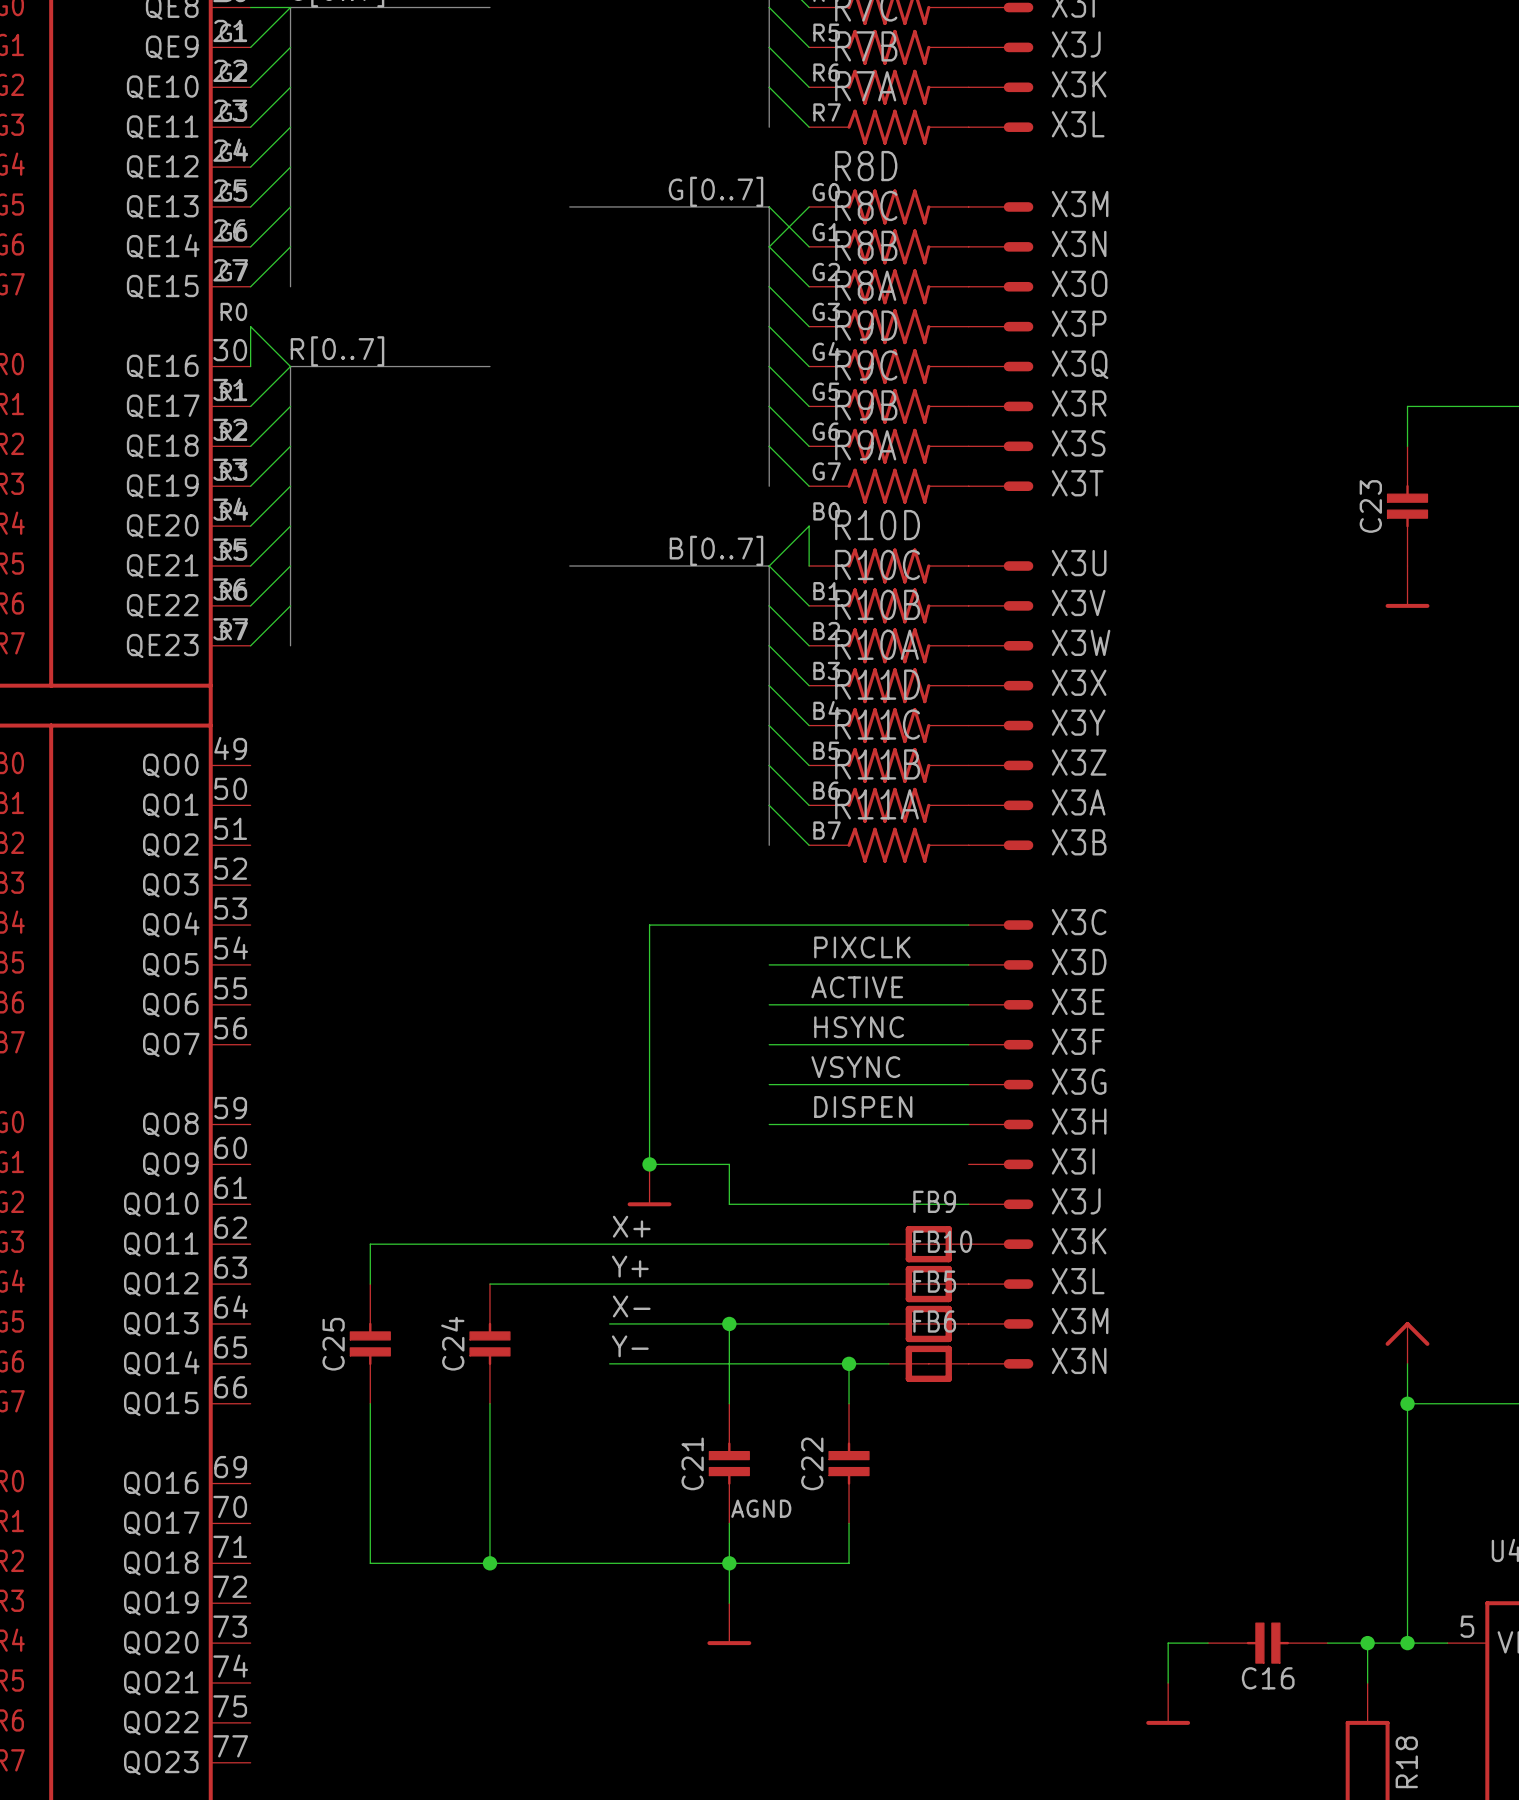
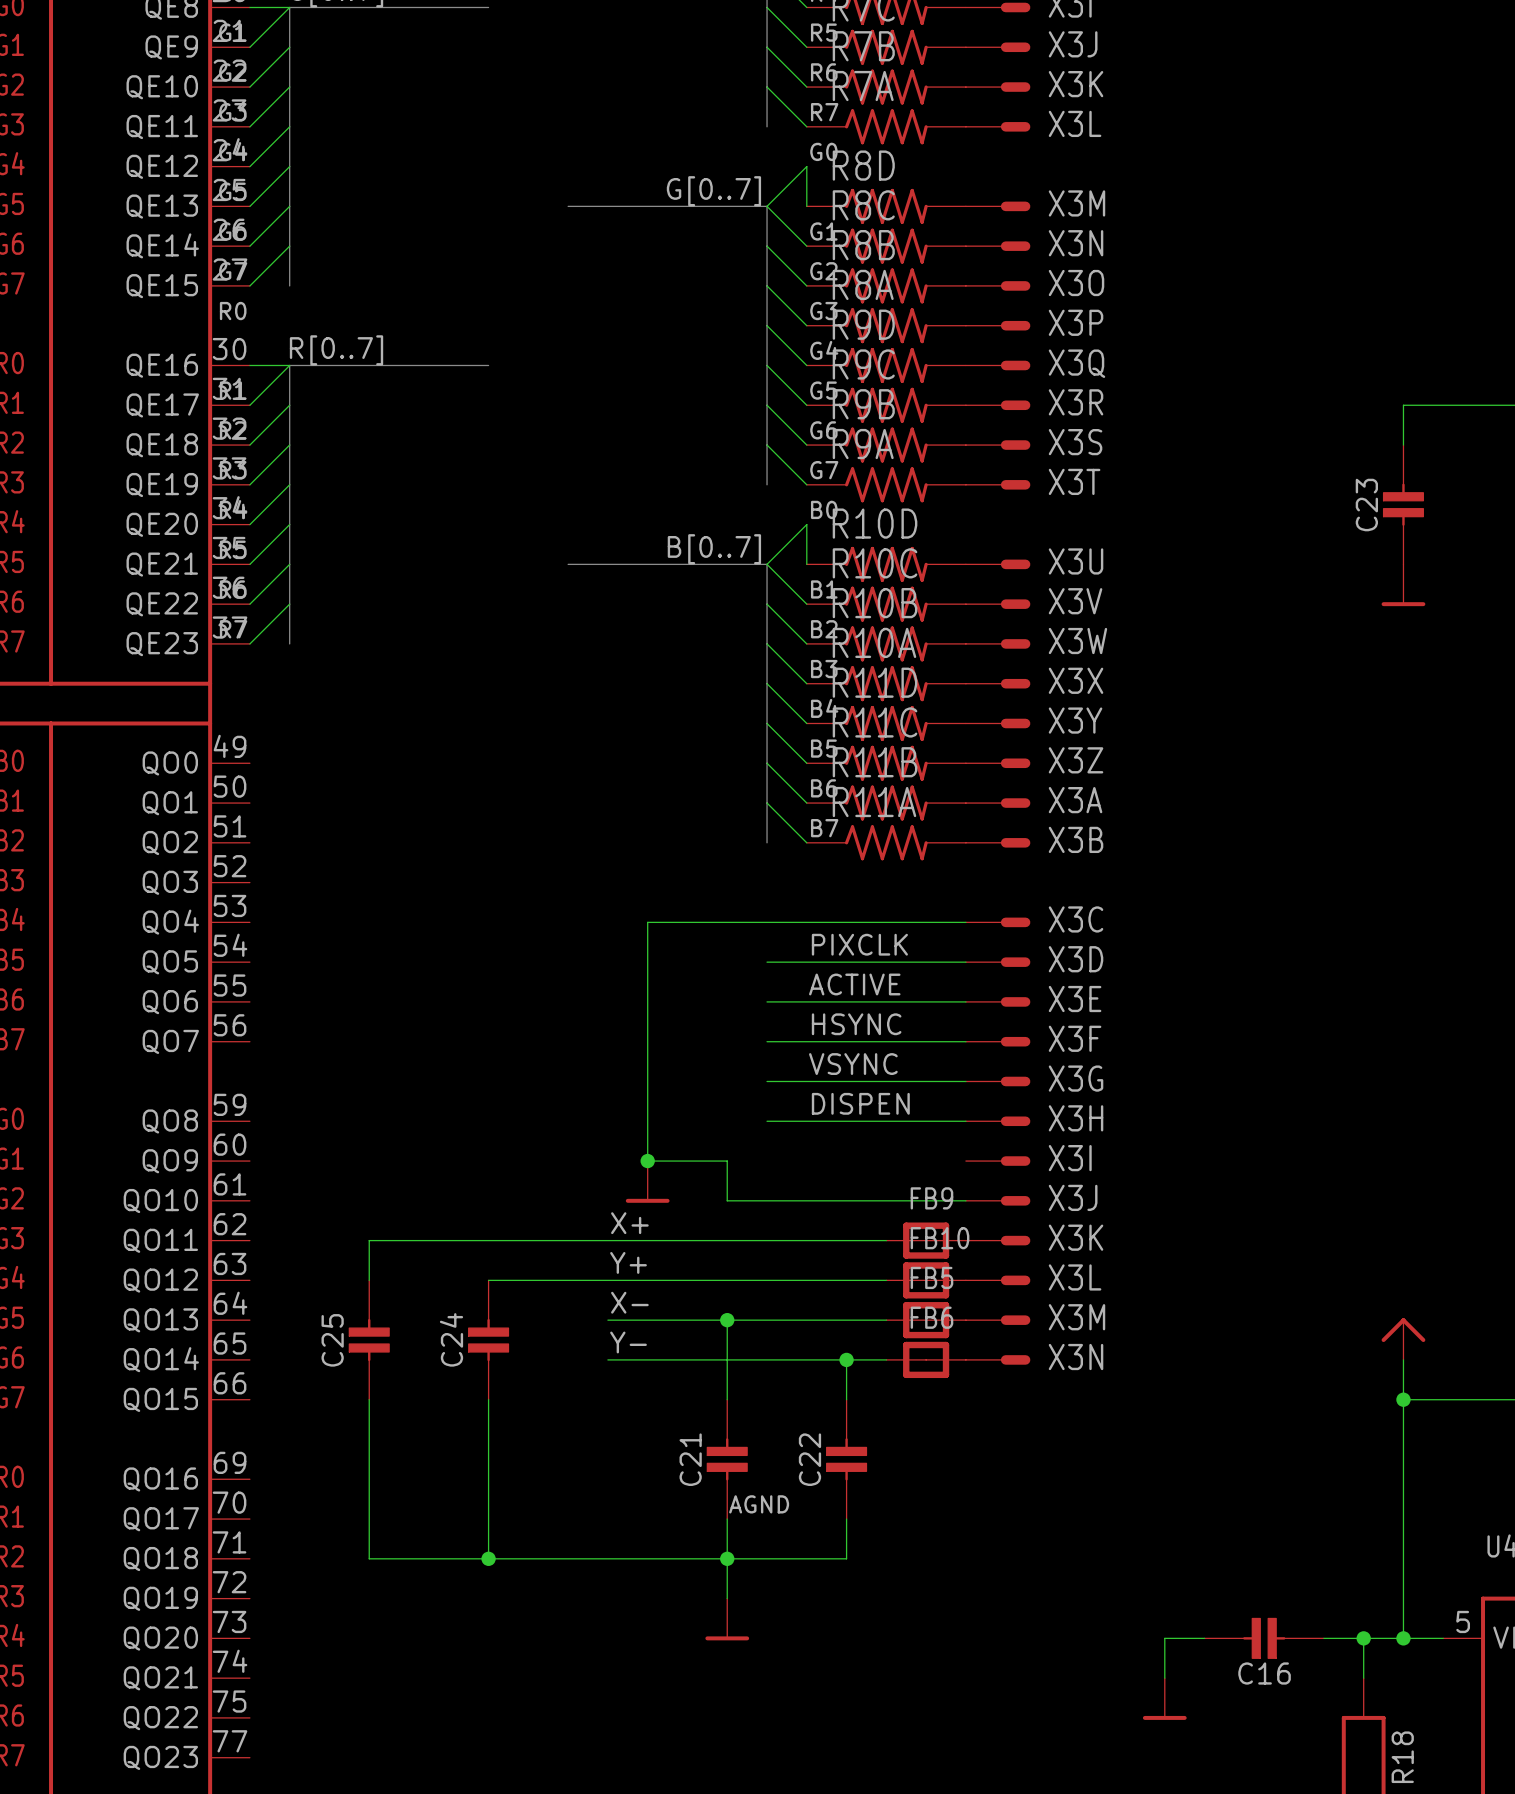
label position: G0 (826, 192) -> G0 (823, 151)
wire: (809, 206) (769, 246) -> (806, 206) (806, 166) (767, 206)
wire: (250, 366) (250, 326) (290, 366) -> (249, 365) (289, 365)

